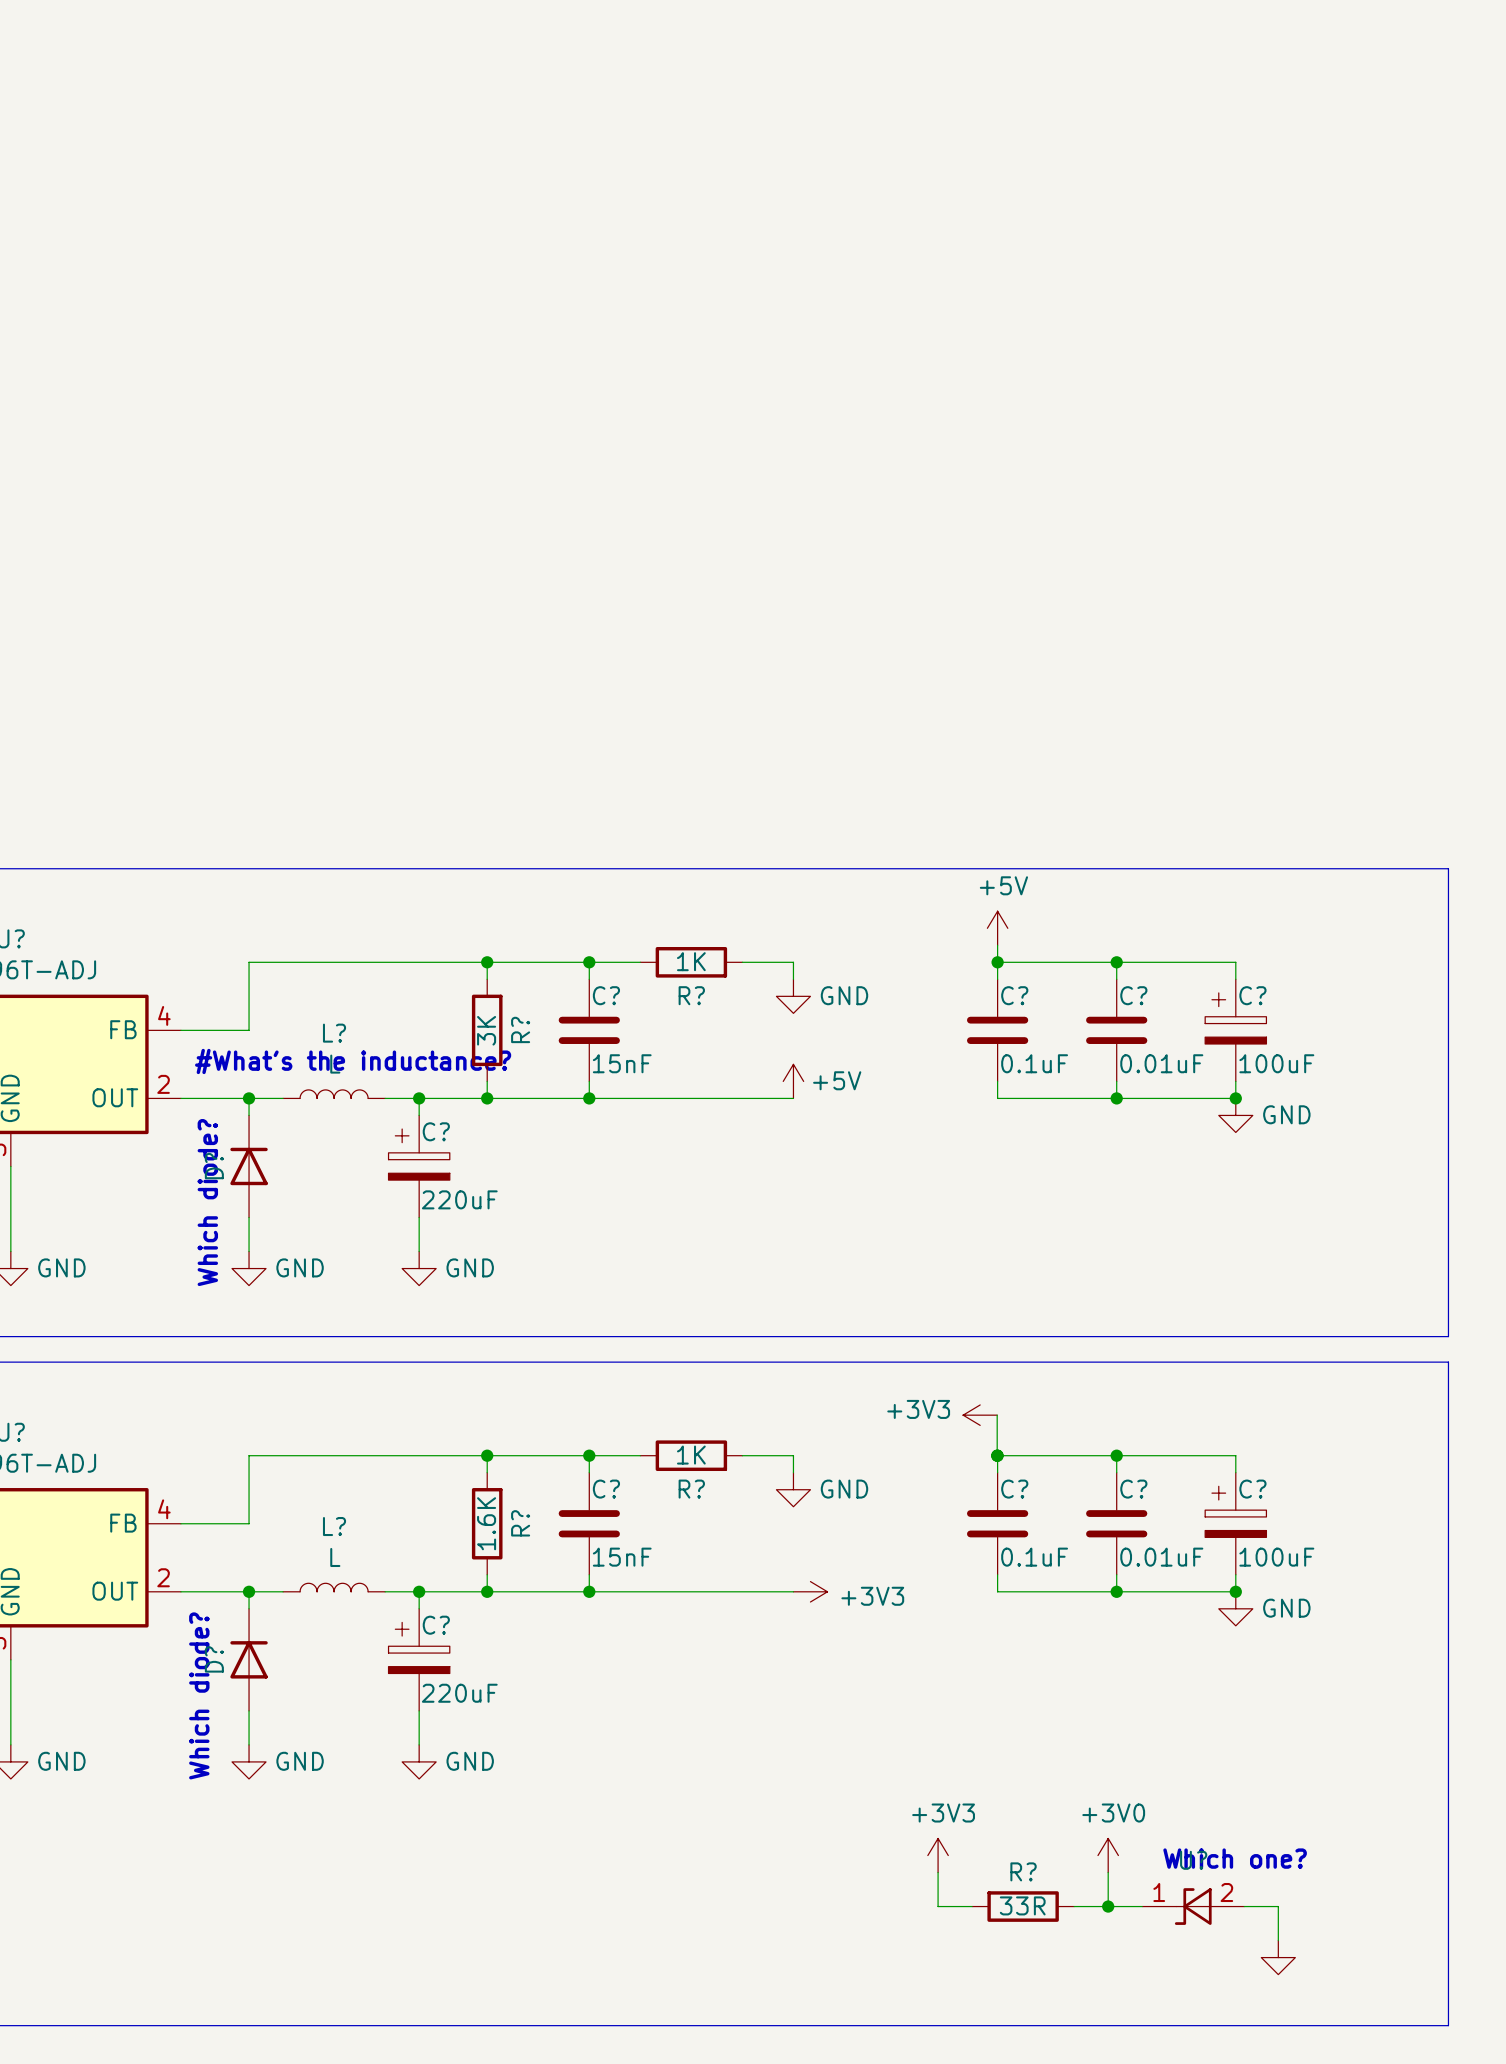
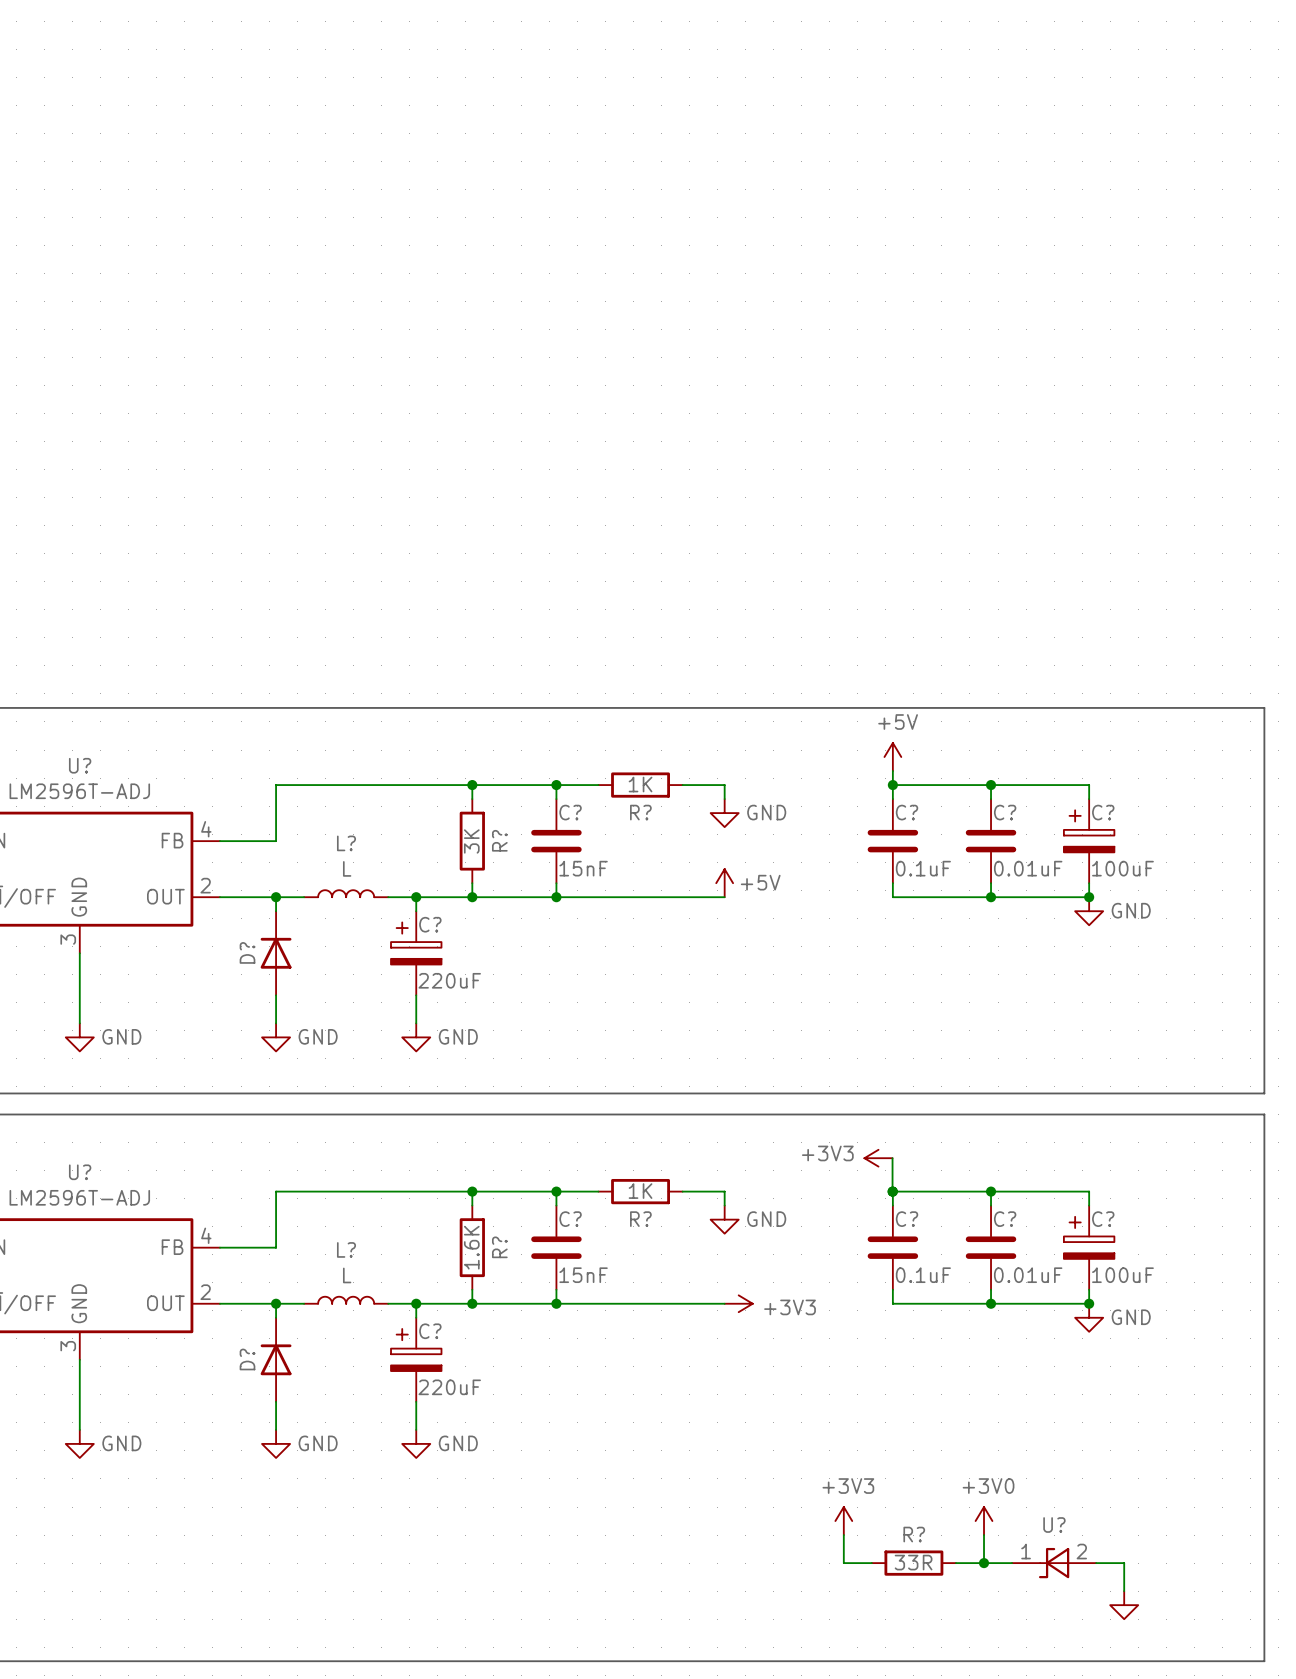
text: #What's the inductance? (353, 1061) -> none
text: Which diode? (207, 1202) -> none
text: Which diode? (199, 1695) -> none
text: Which one? (1235, 1858) -> none

